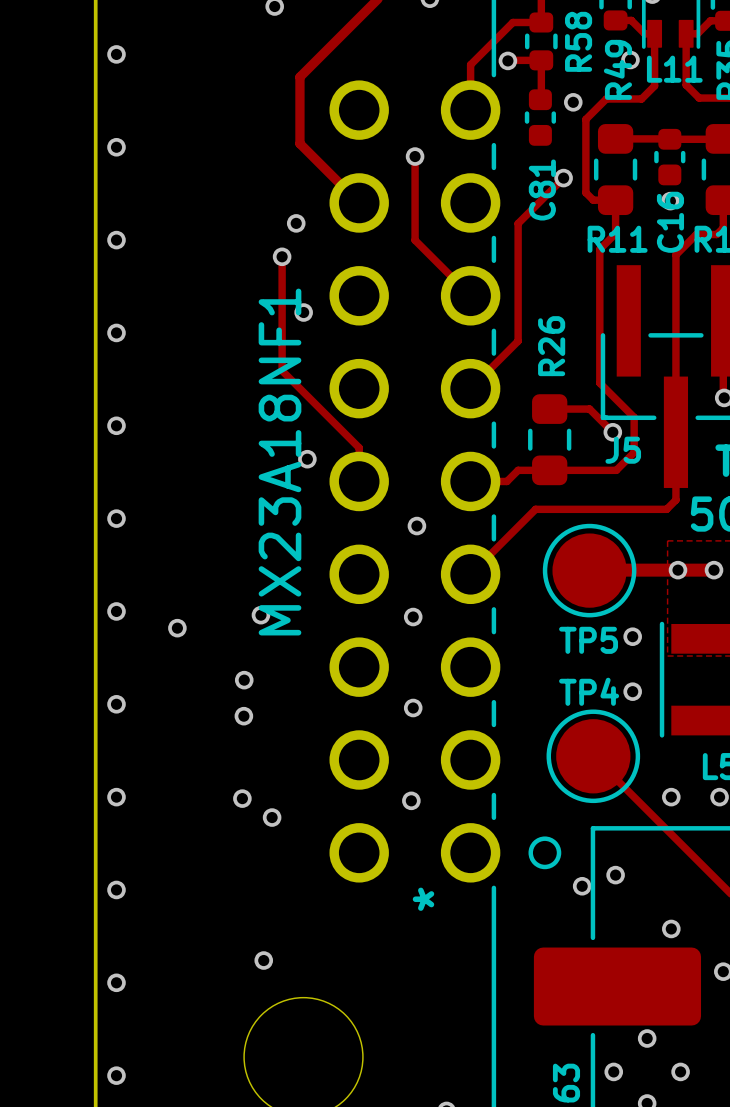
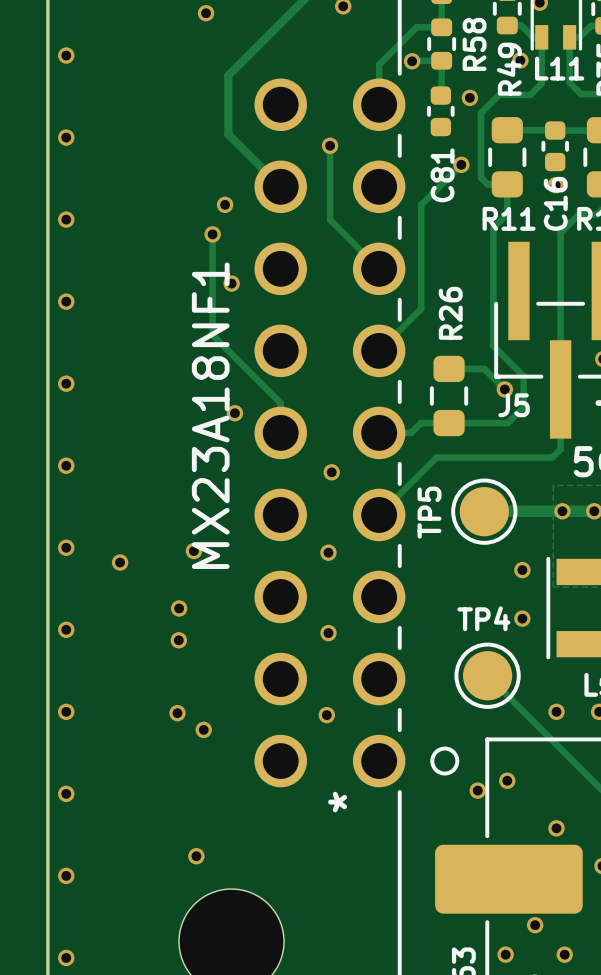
TP5 footprint: [542, 523, 637, 618] -> [451, 478, 518, 545]
TP5 name rotation: 0° (588, 640) -> 90° counterclockwise (429, 512)
TP5 name position: TP5 (588, 640) -> TP5 (429, 512)
TP4 footprint: [546, 709, 641, 804] -> [454, 642, 521, 709]

